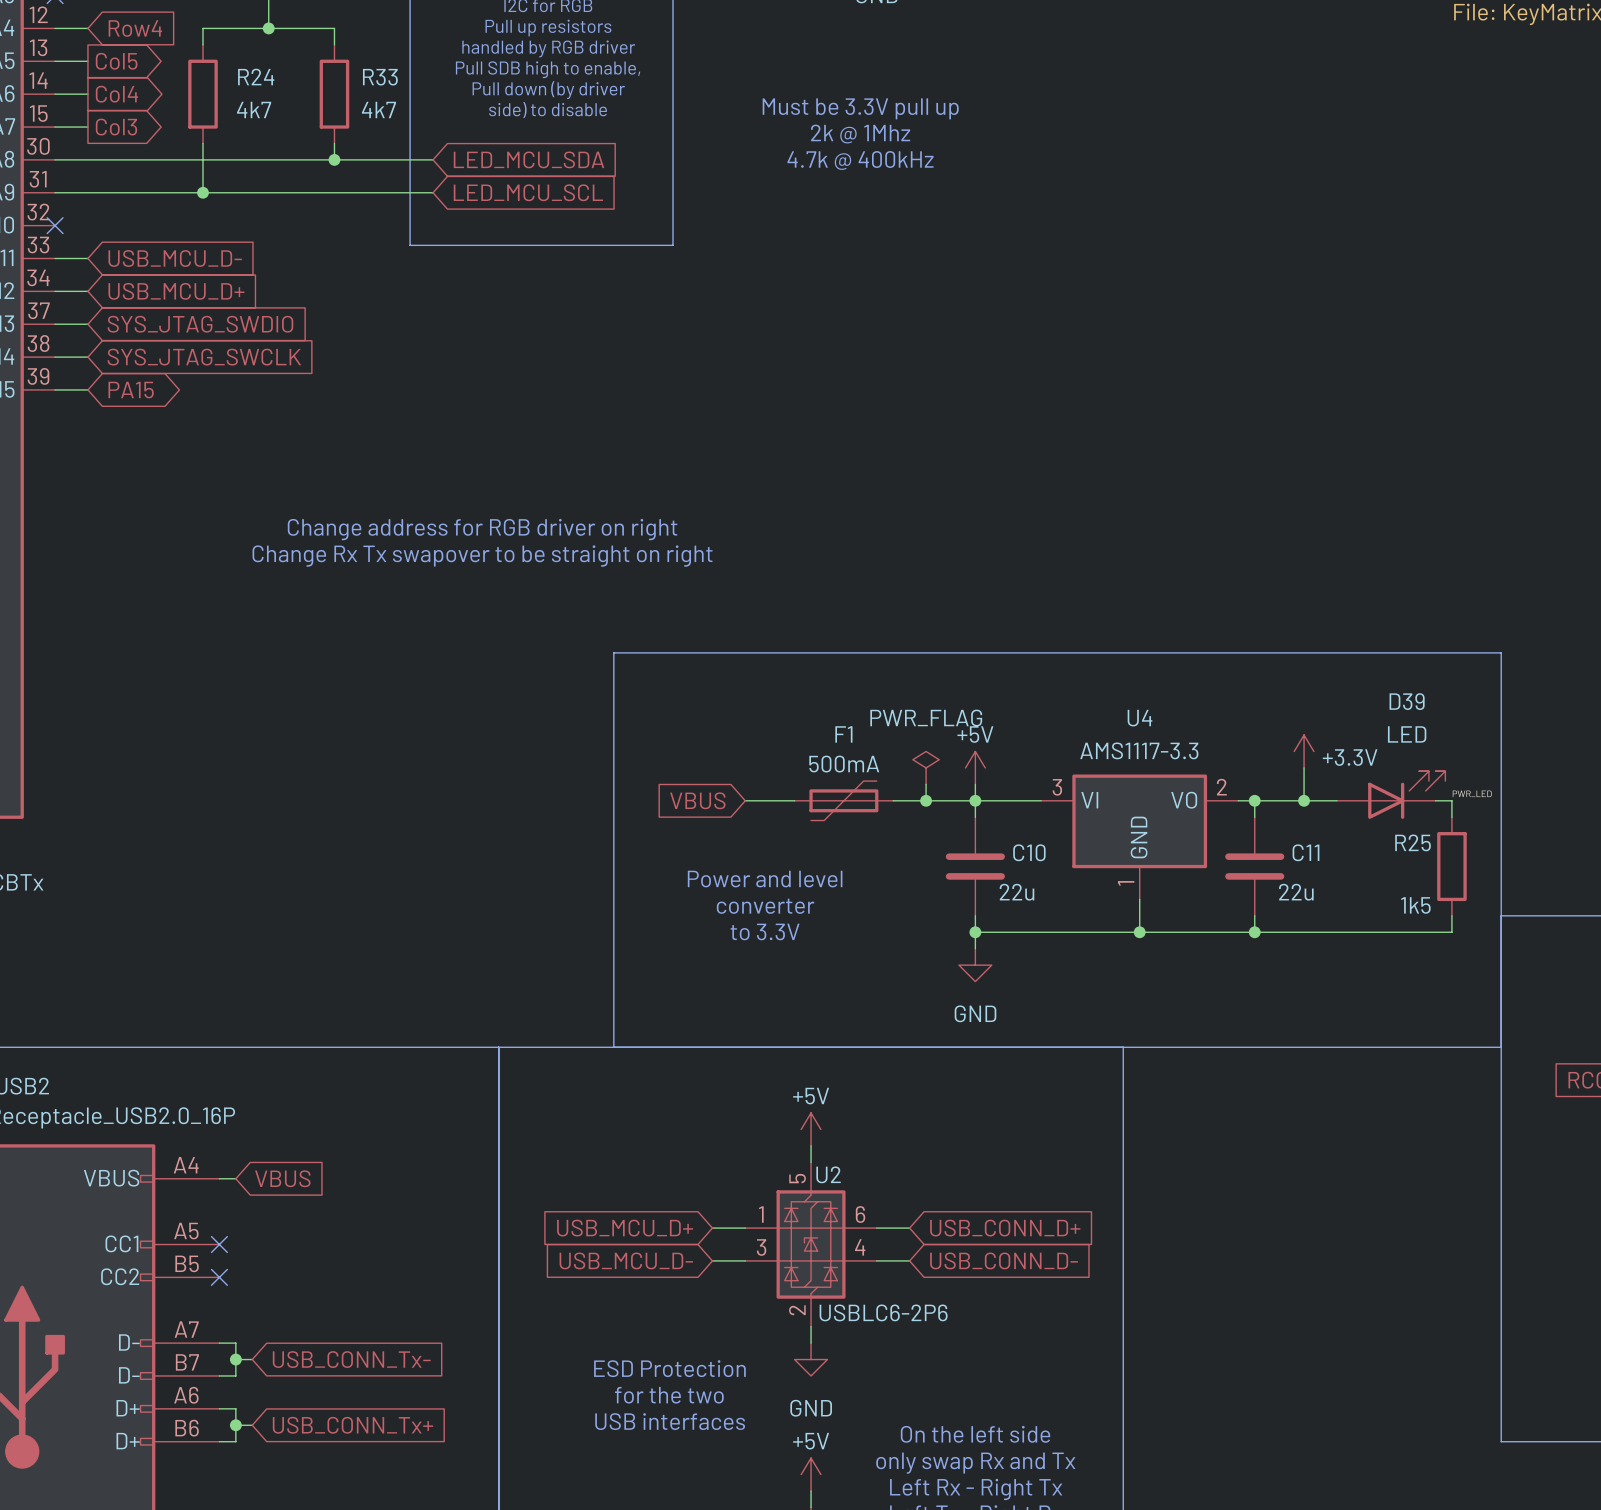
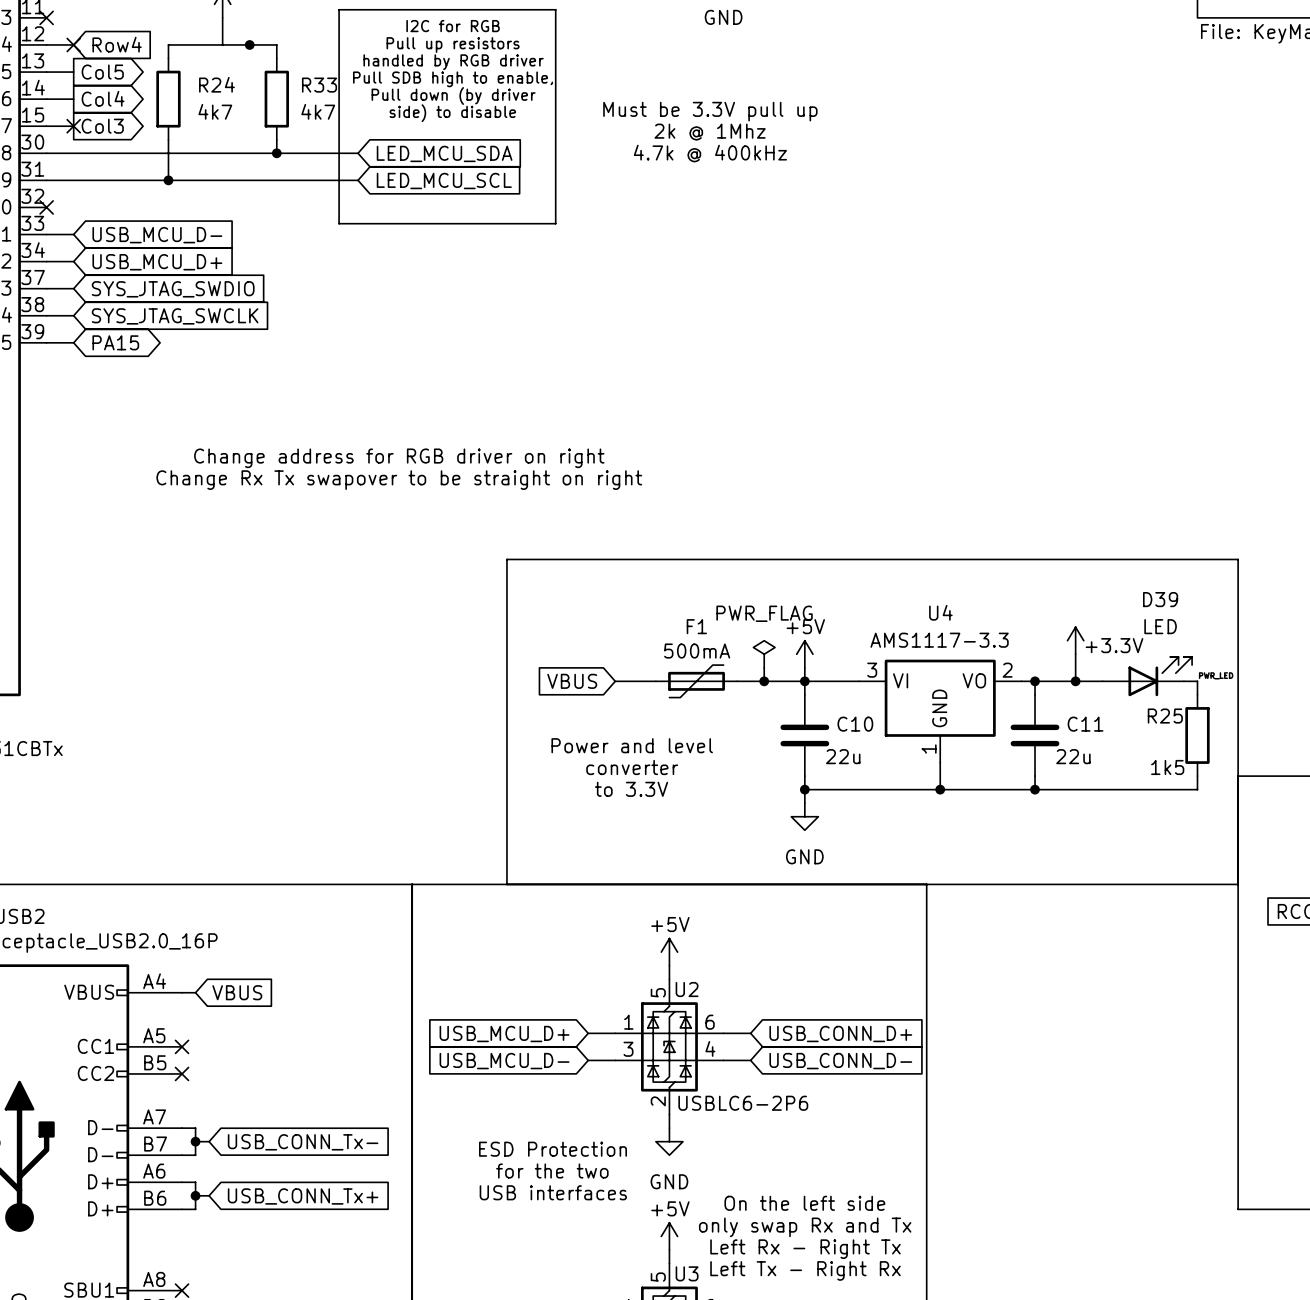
no-connect mark: none -> (73, 44)
junction position: (268, 28) -> (249, 44)
no-connect mark: none -> (73, 126)

